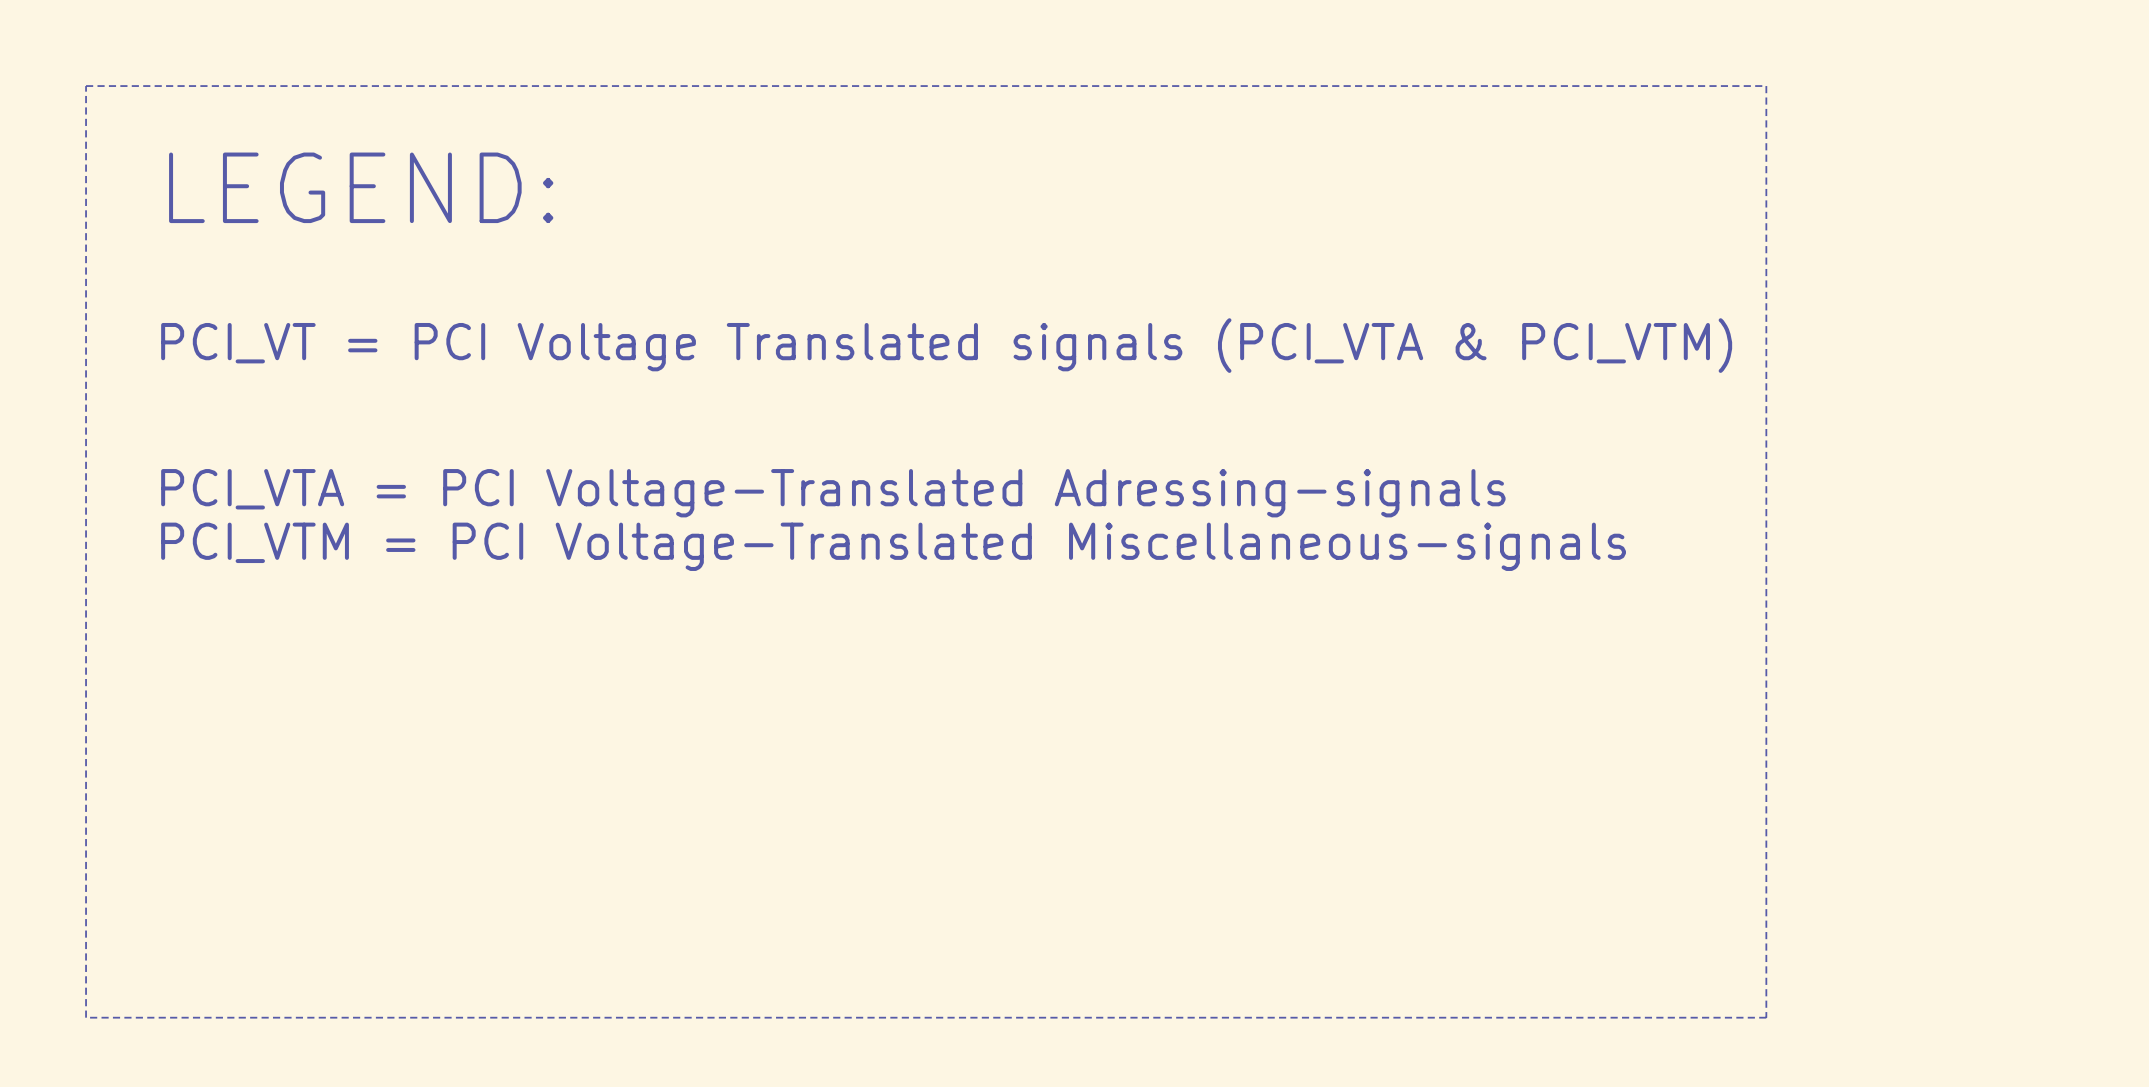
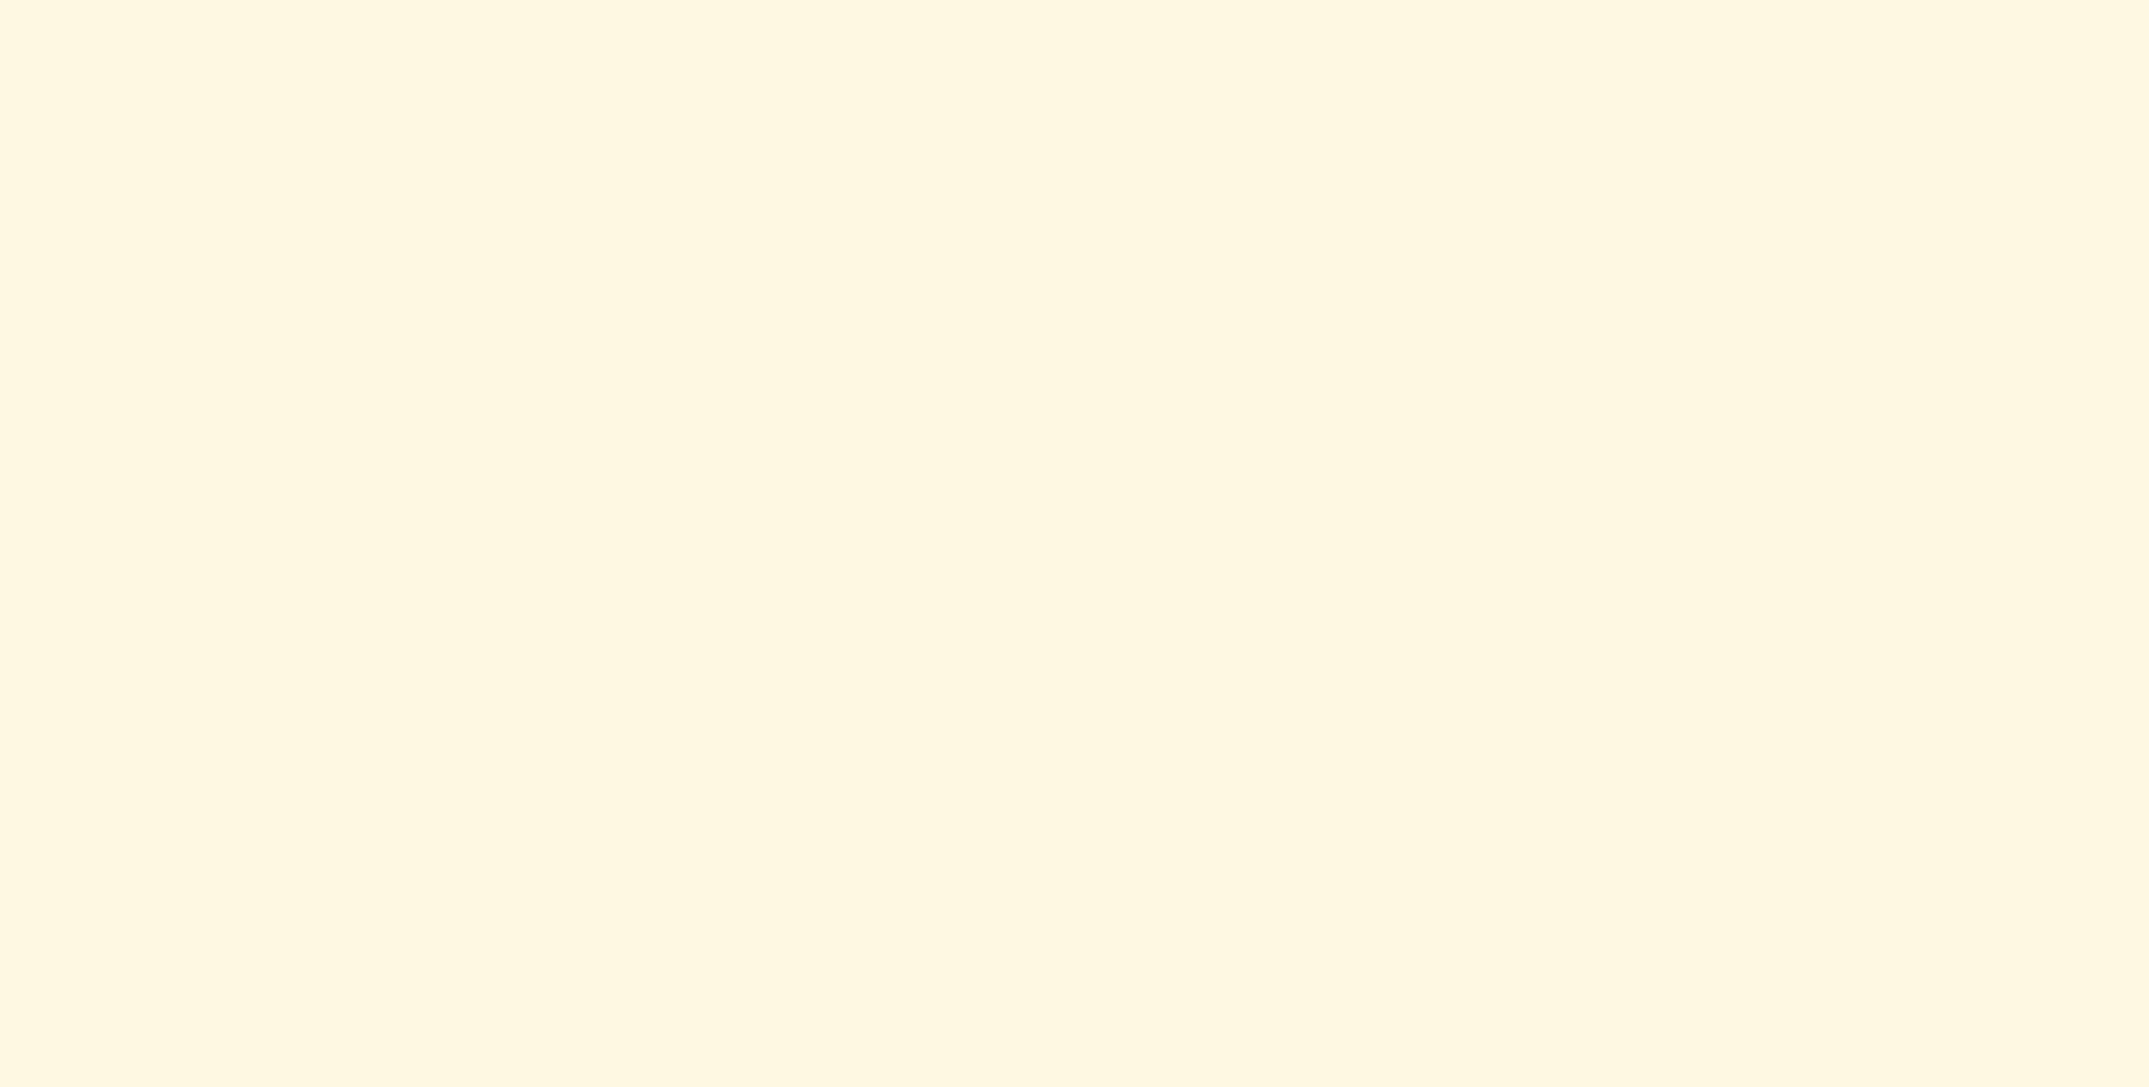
line: (86, 86) (86, 1017) (1766, 1017) (1766, 86) (86, 86) -> none
text: LEGEND: (361, 187) -> none
text: PCI_VT = PCI Voltage Translated signals (PCI_VTA & PCI_VTM) (946, 345) -> none
text: PCI_VTA = PCI Voltage-Translated Adressing-signals (833, 493) -> none
text: PCI_VTM = PCI Voltage-Translated Miscellaneous-signals (893, 546) -> none

